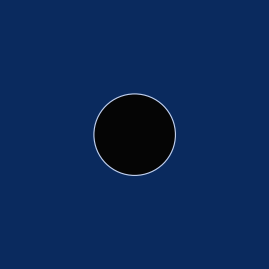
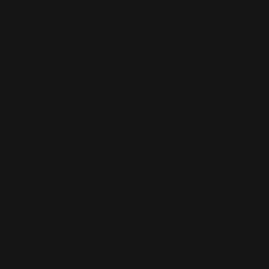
part: (134, 134) -> none

